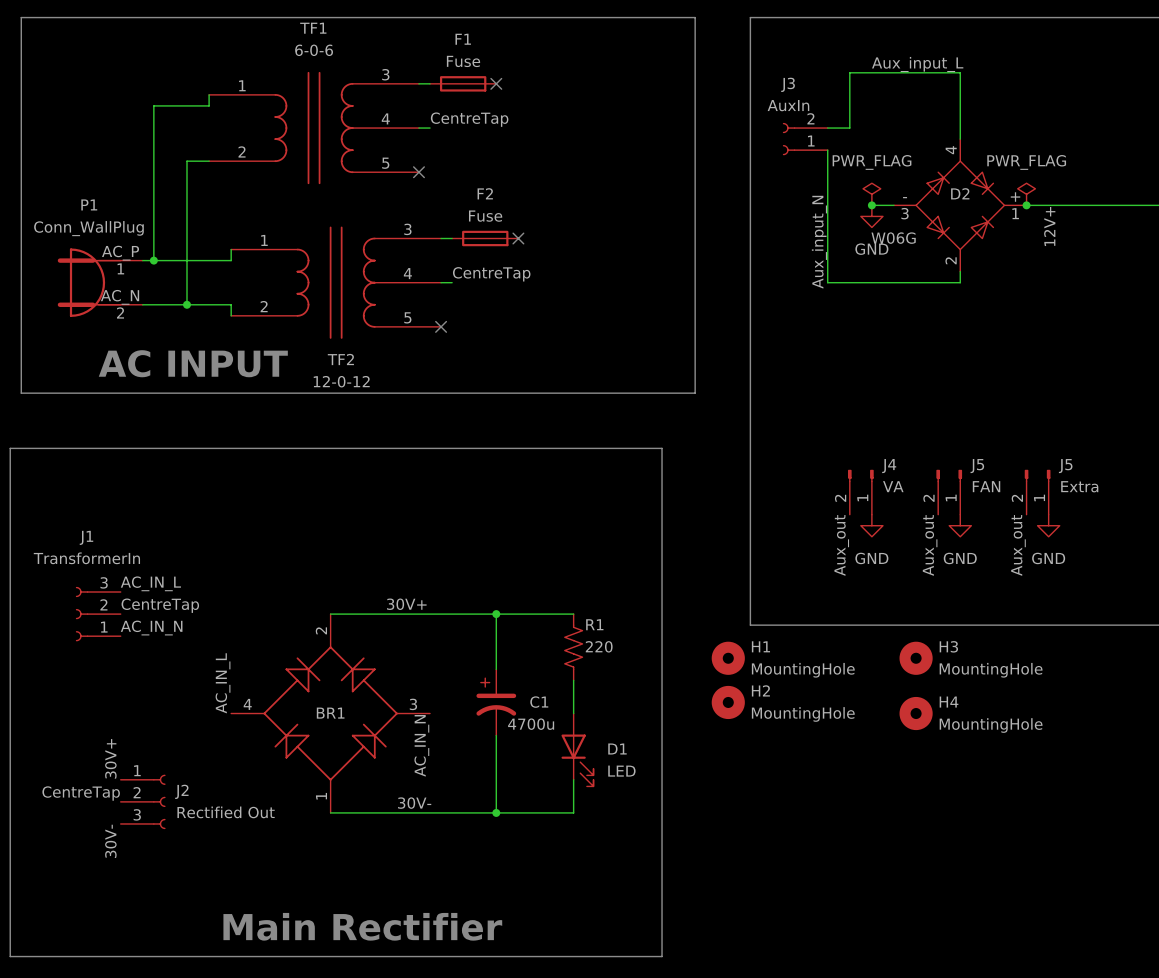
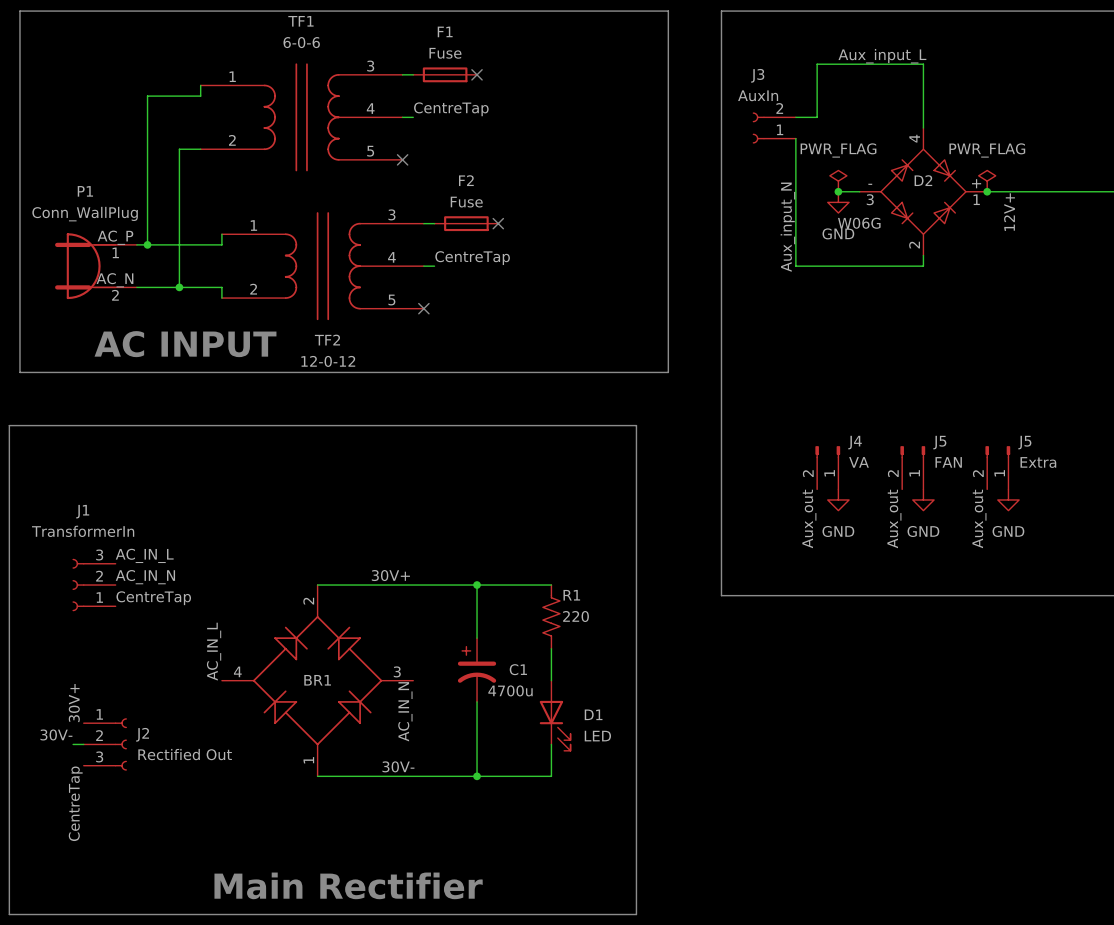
label: CentreTap (160, 605) -> AC_IN_N (145, 577)
label: AC_IN_N (151, 628) -> CentreTap (153, 598)
H1: MountingHole (728, 658) -> none
H3: MountingHole (916, 658) -> none
H2: MountingHole (728, 702) -> none
H4: MountingHole (916, 713) -> none
label position: 30V+ (110, 758) -> 30V+ (74, 703)
wire: none -> (73, 744) (83, 744)
label rotation: 0° (81, 793) -> 90° counterclockwise (75, 803)
J2 position: (143, 801) -> (105, 744)
label rotation: 0° (110, 841) -> 90° clockwise (56, 734)
label position: 30V- (110, 841) -> 30V- (56, 734)

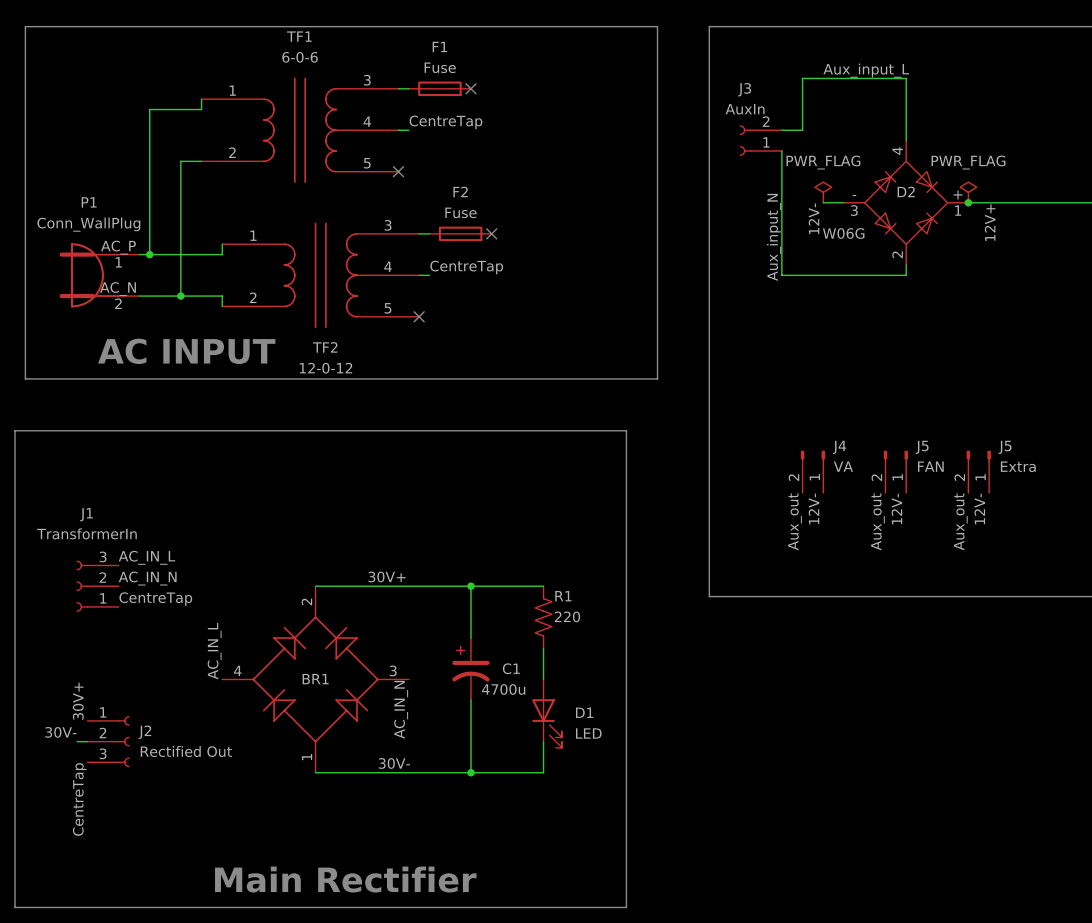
junction: (838, 191) -> none
power symbol: GND (838, 202) -> none
label: none -> 12V- (813, 218)
power symbol: GND (838, 499) -> none
power symbol: GND (923, 499) -> none
power symbol: GND (1008, 499) -> none
label: none -> 12V- (813, 508)
label: none -> 12V- (896, 508)
label: none -> 12V- (979, 508)

